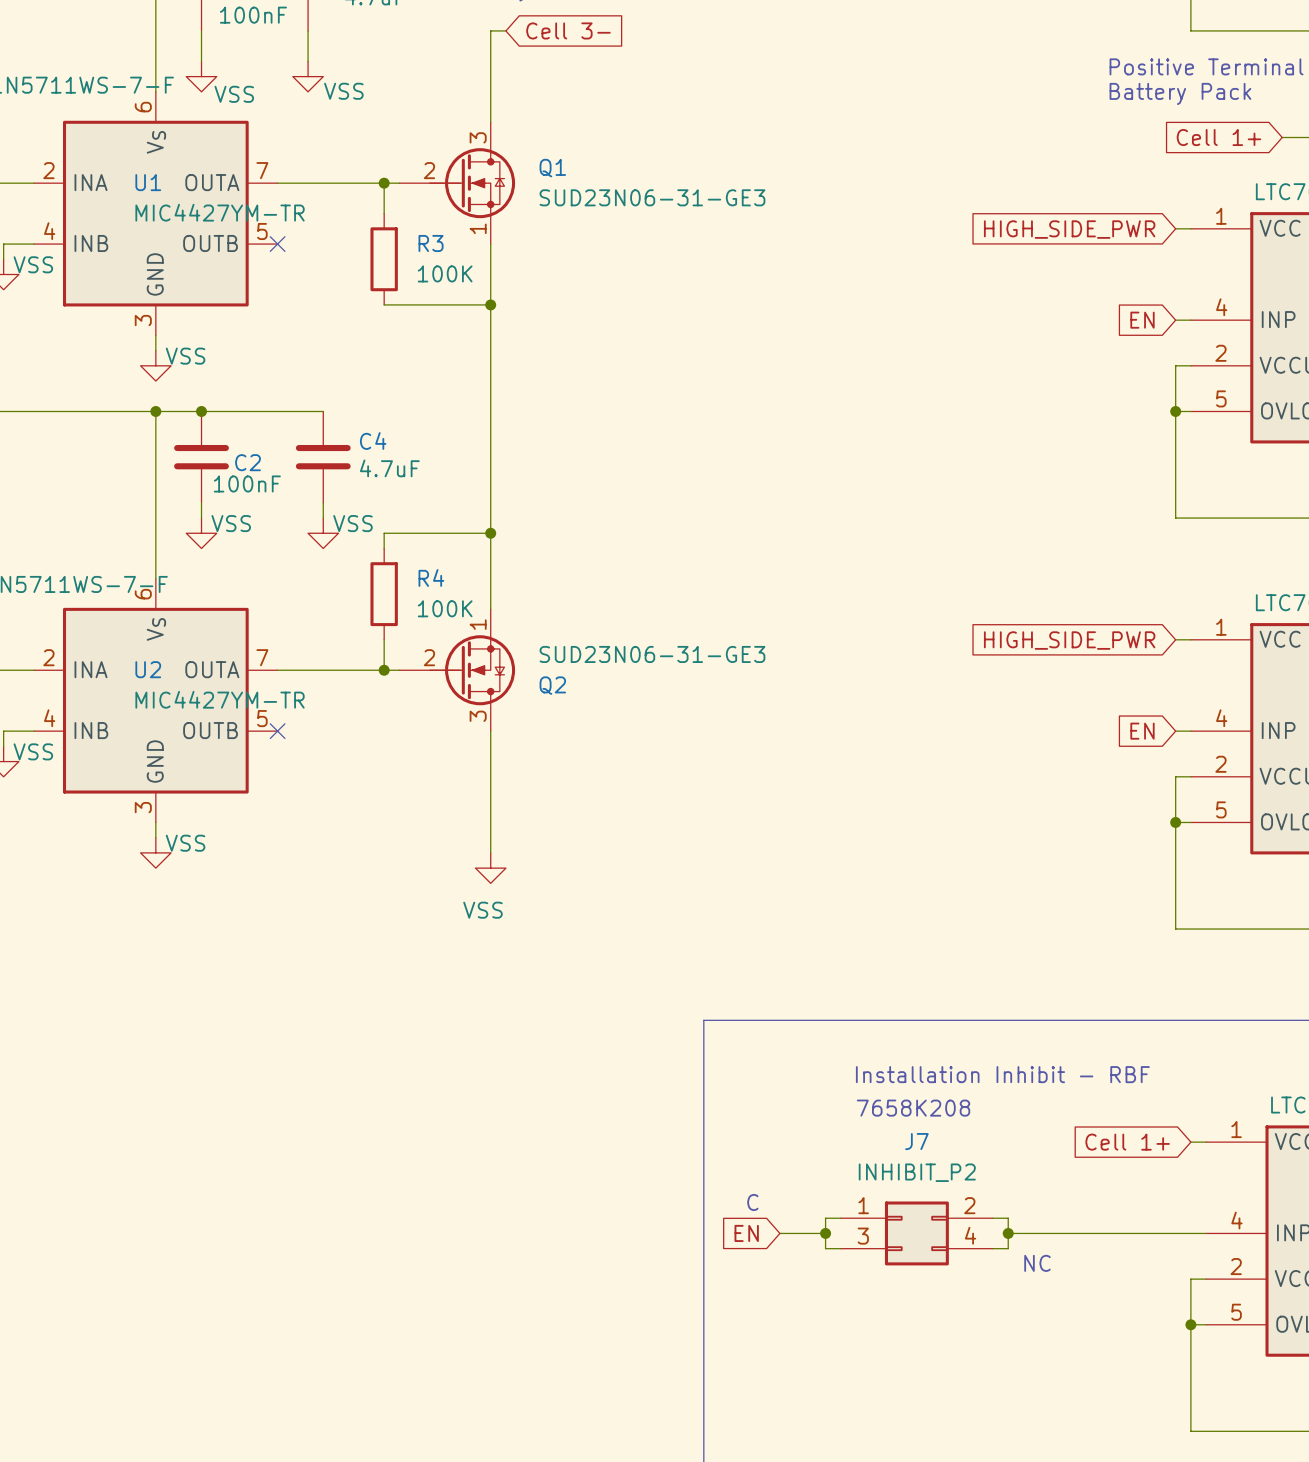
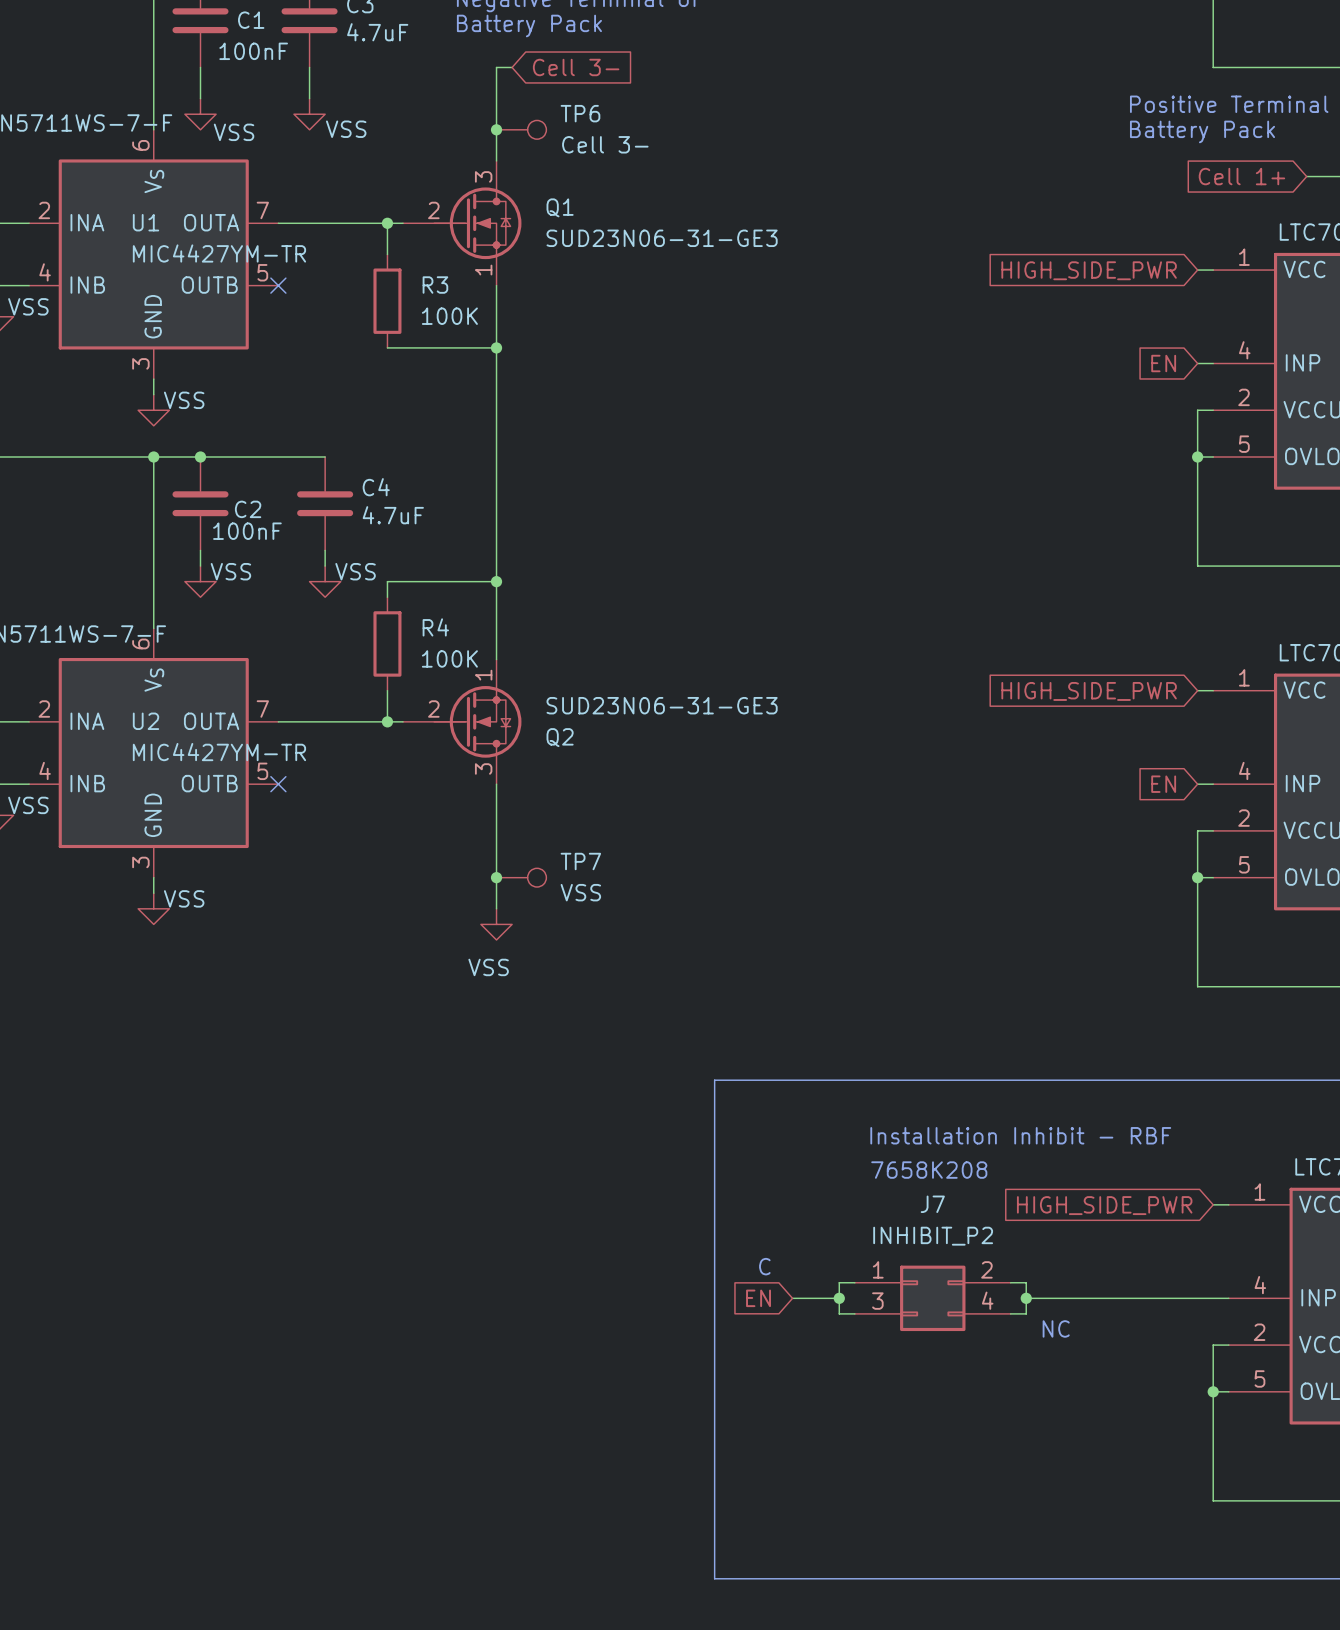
junction: none -> (496, 129)
TP6: none -> Cell 3- (521, 129)
junction: none -> (496, 877)
TP7: none -> VSS (521, 877)
global label: Cell 1+ (1127, 1142) -> HIGH_SIDE_PWR (1104, 1205)

